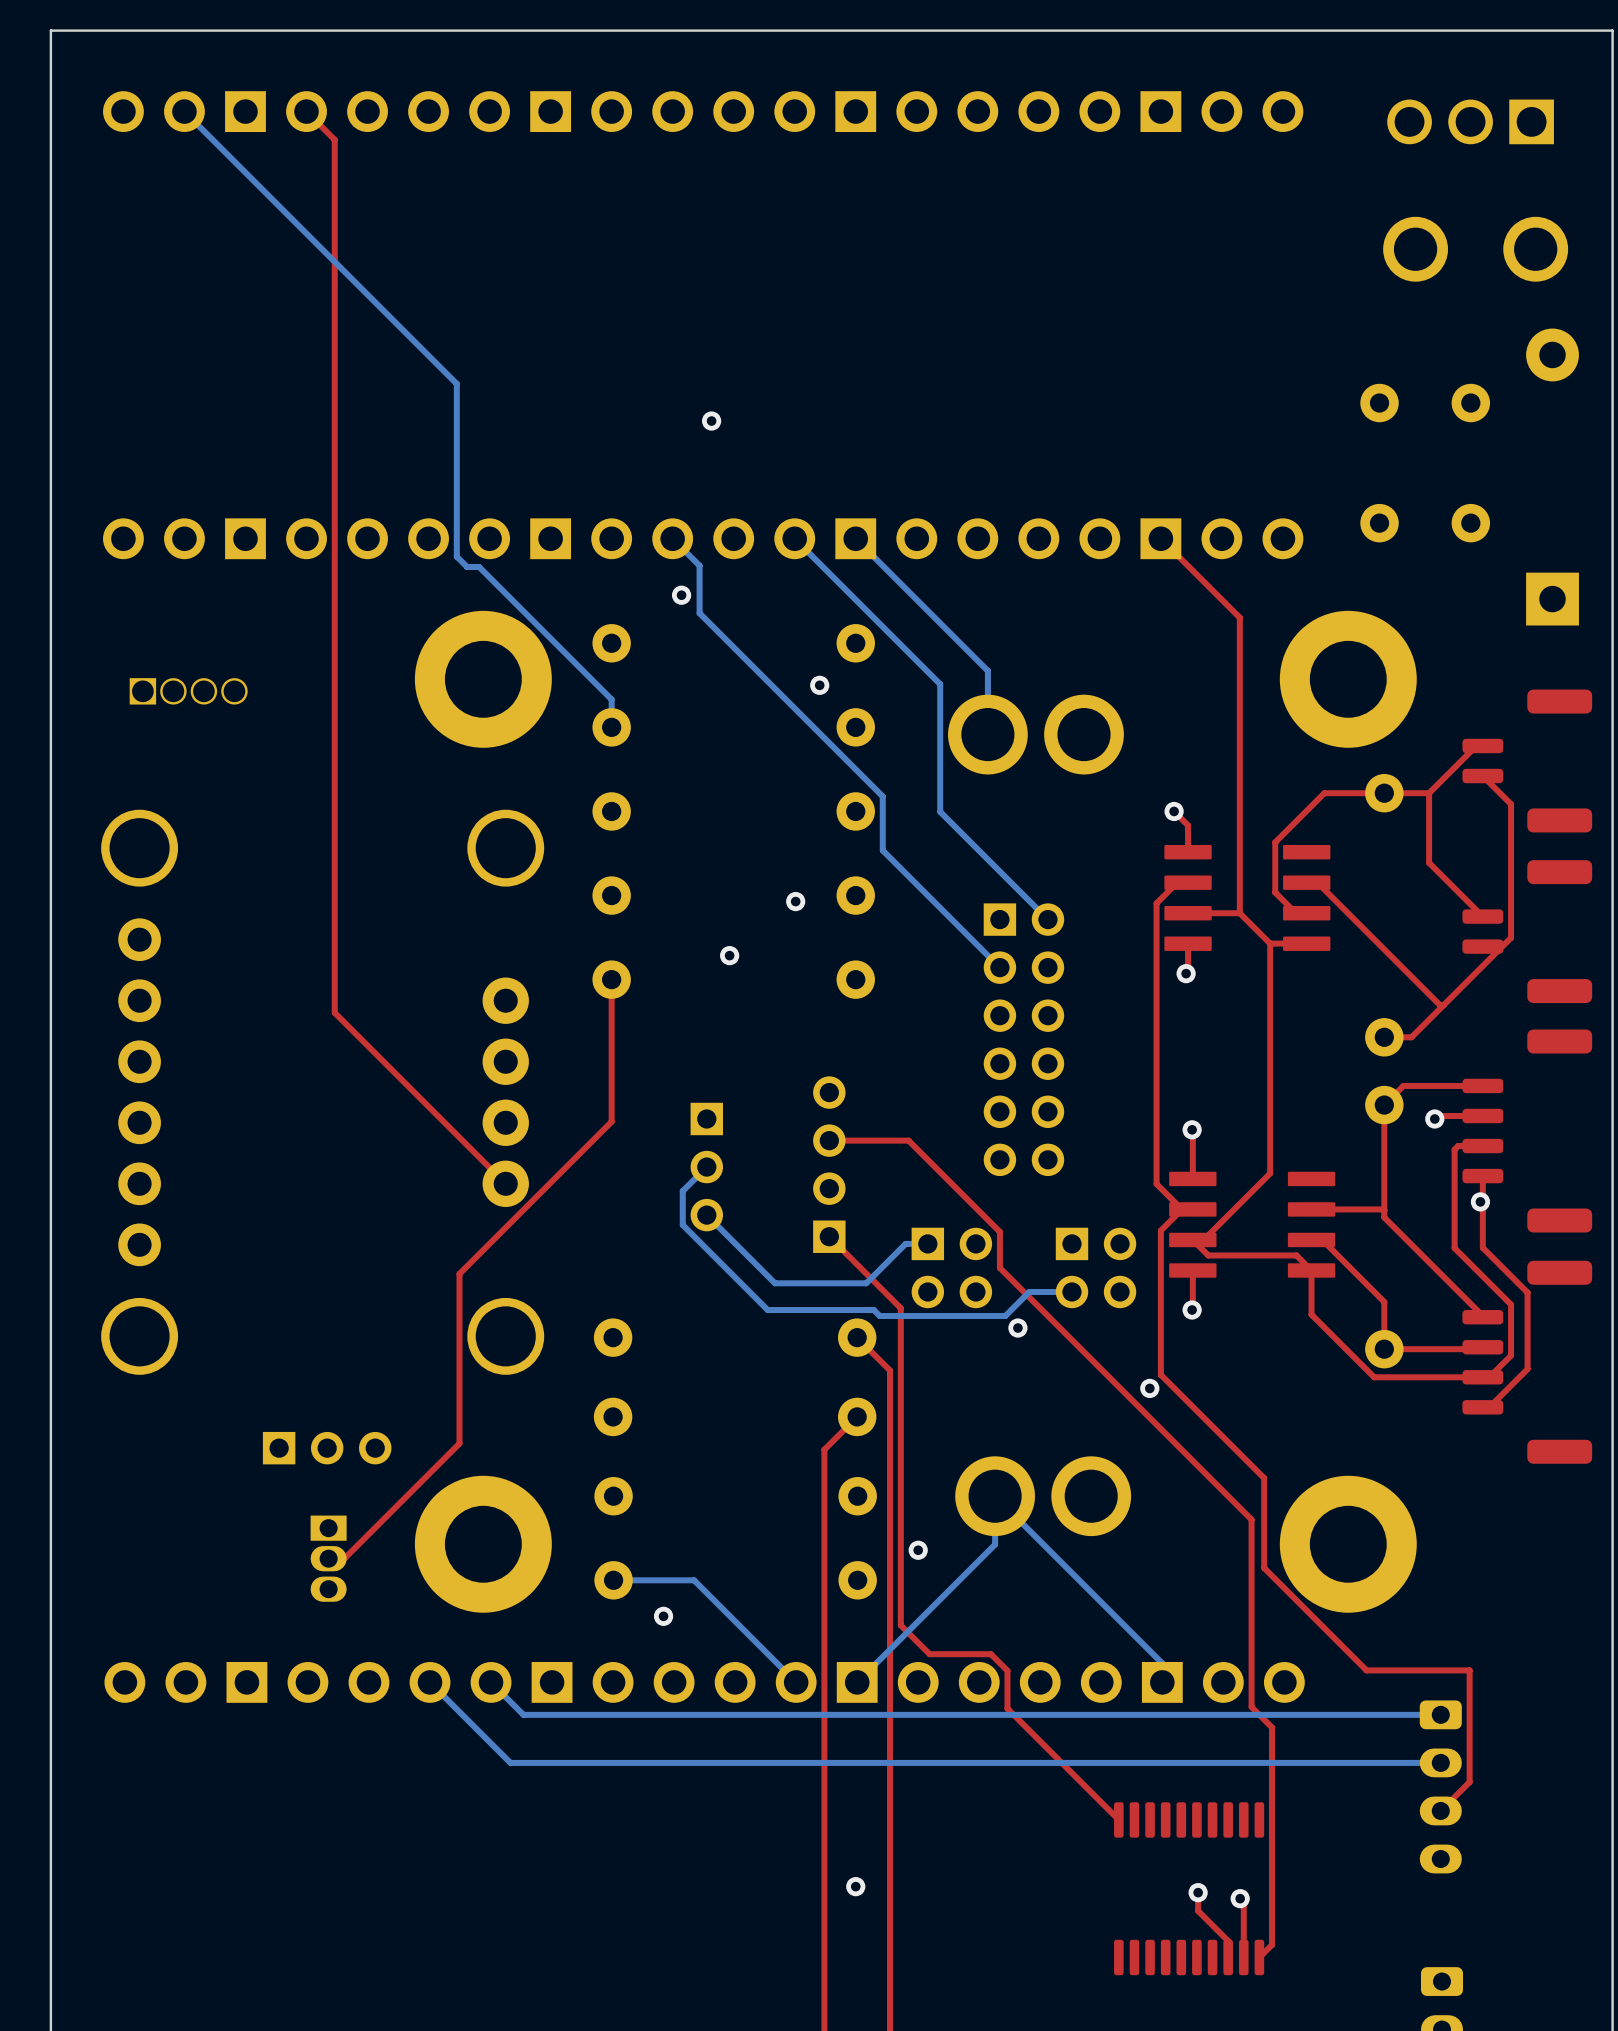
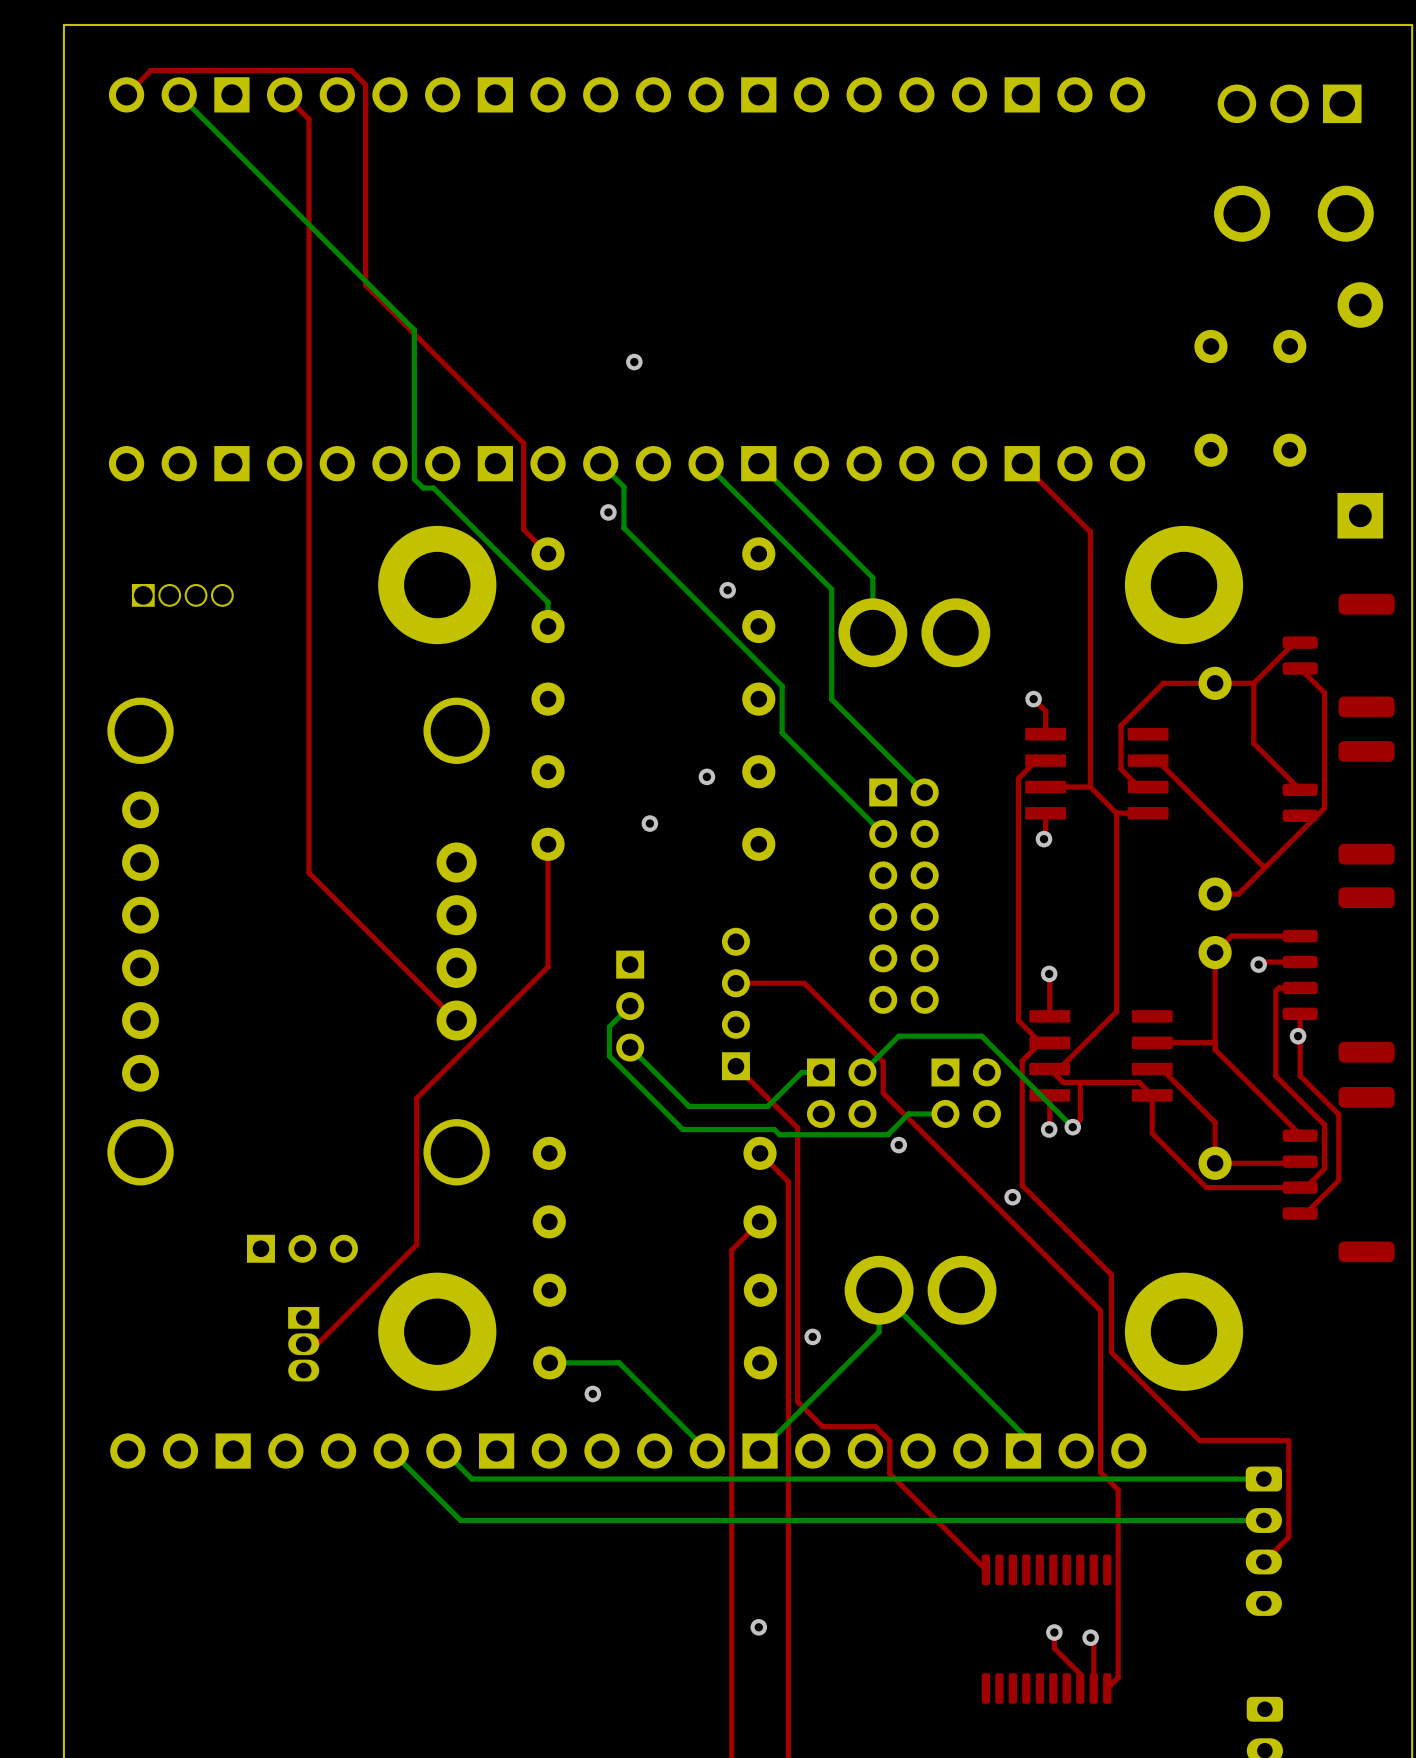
top track: none -> (126, 94) (150, 70) (351, 70) (365, 84) (365, 285) (523, 443) (523, 529) (548, 553)
bottom track: none -> (862, 1072) (898, 1036) (981, 1036) (1072, 1127)
top track: none -> (1080, 1082) (1080, 1119) (1072, 1127)
via: none -> (1072, 1127)

